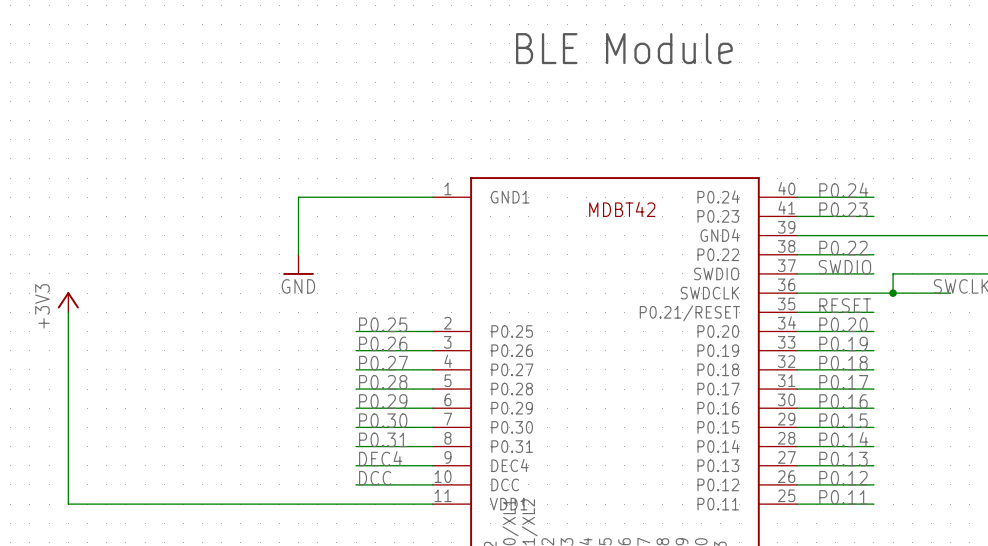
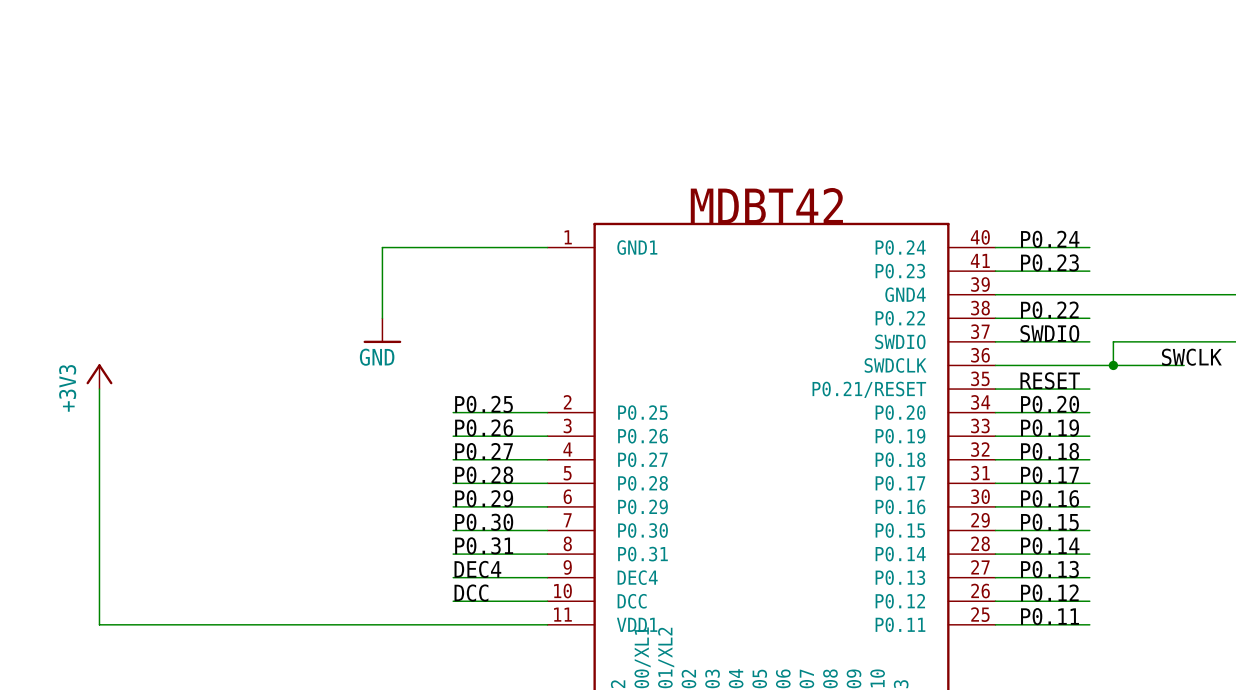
text: BLE Module (624, 48) -> none
text: none -> MDBT42 (766, 205)
part text: MDBT42 (622, 209) -> none

